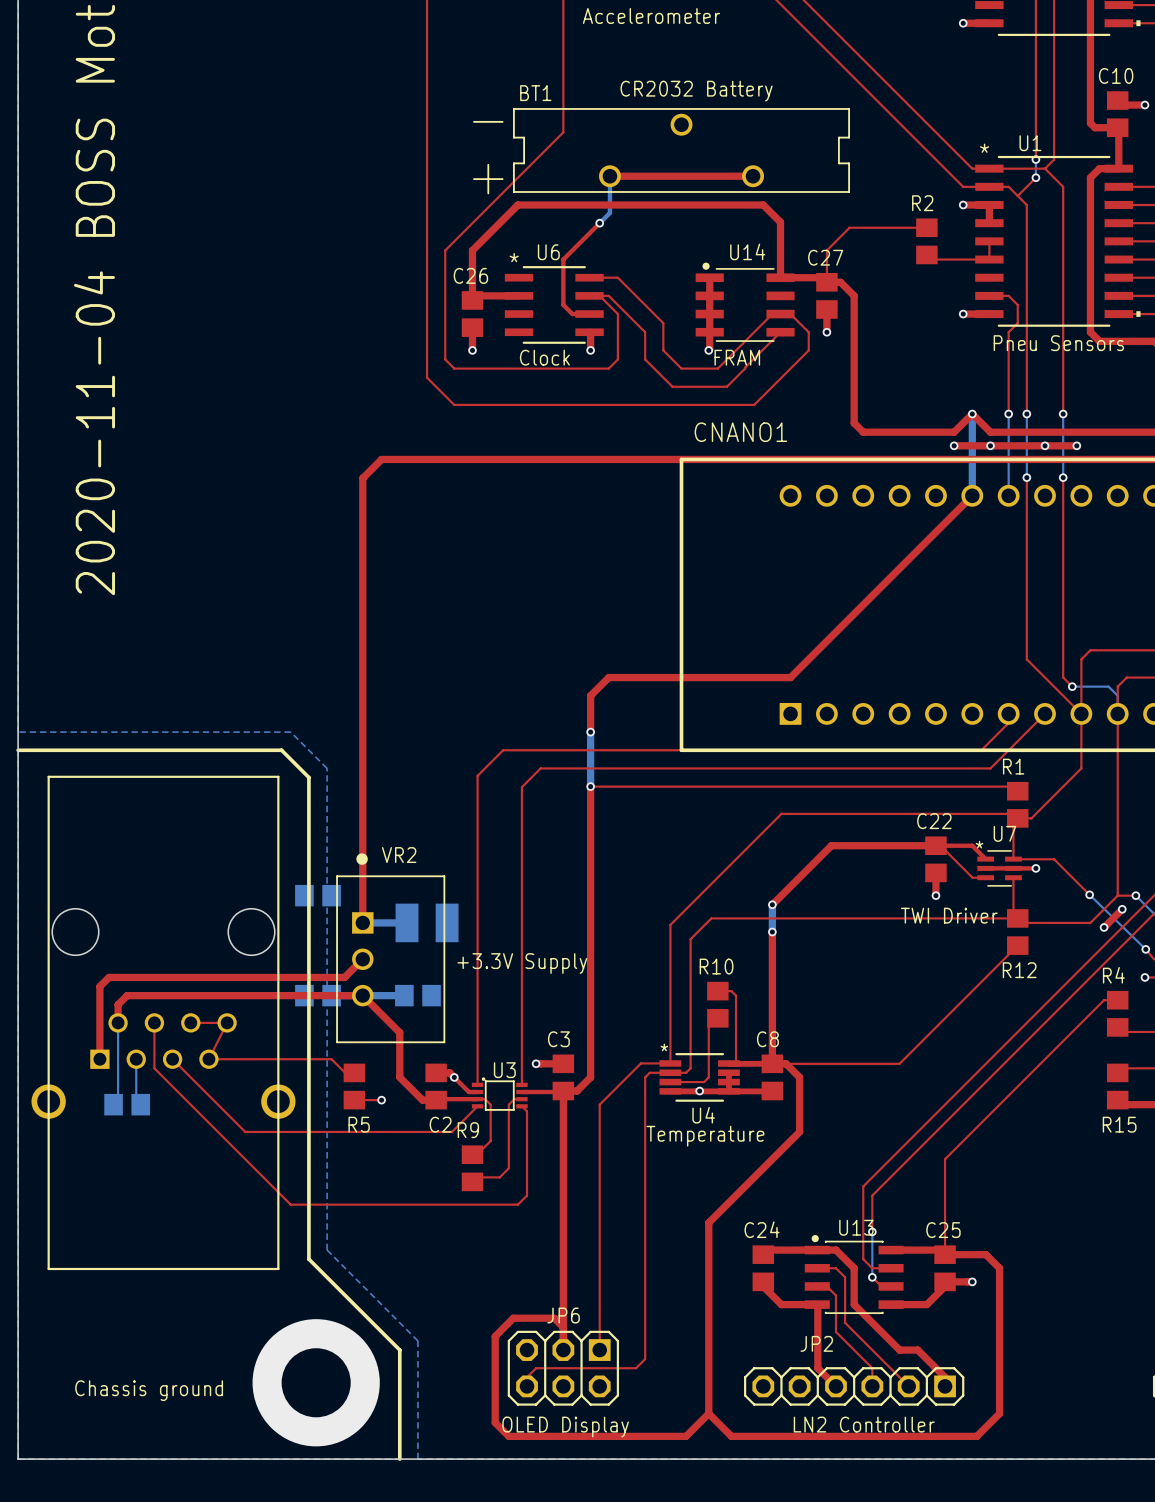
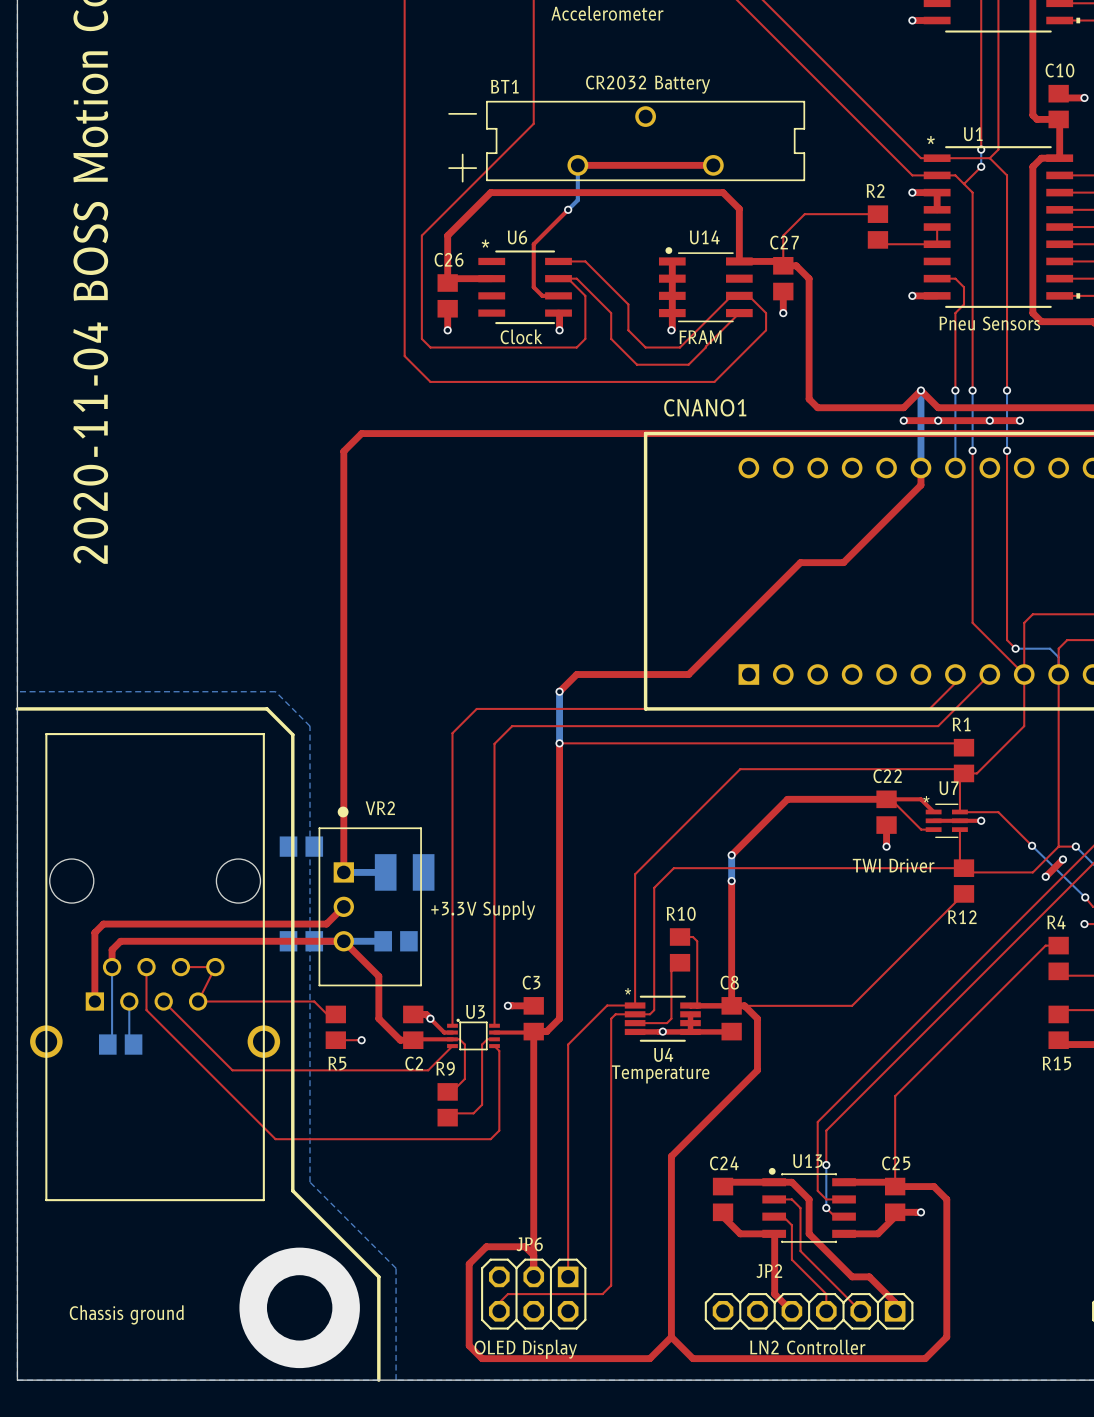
top track: (972, 495) (790, 677) (608, 677) (590, 695) (590, 732) -> (920, 467) (920, 485) (843, 562) (800, 562) (688, 674) (576, 674) (559, 691)

